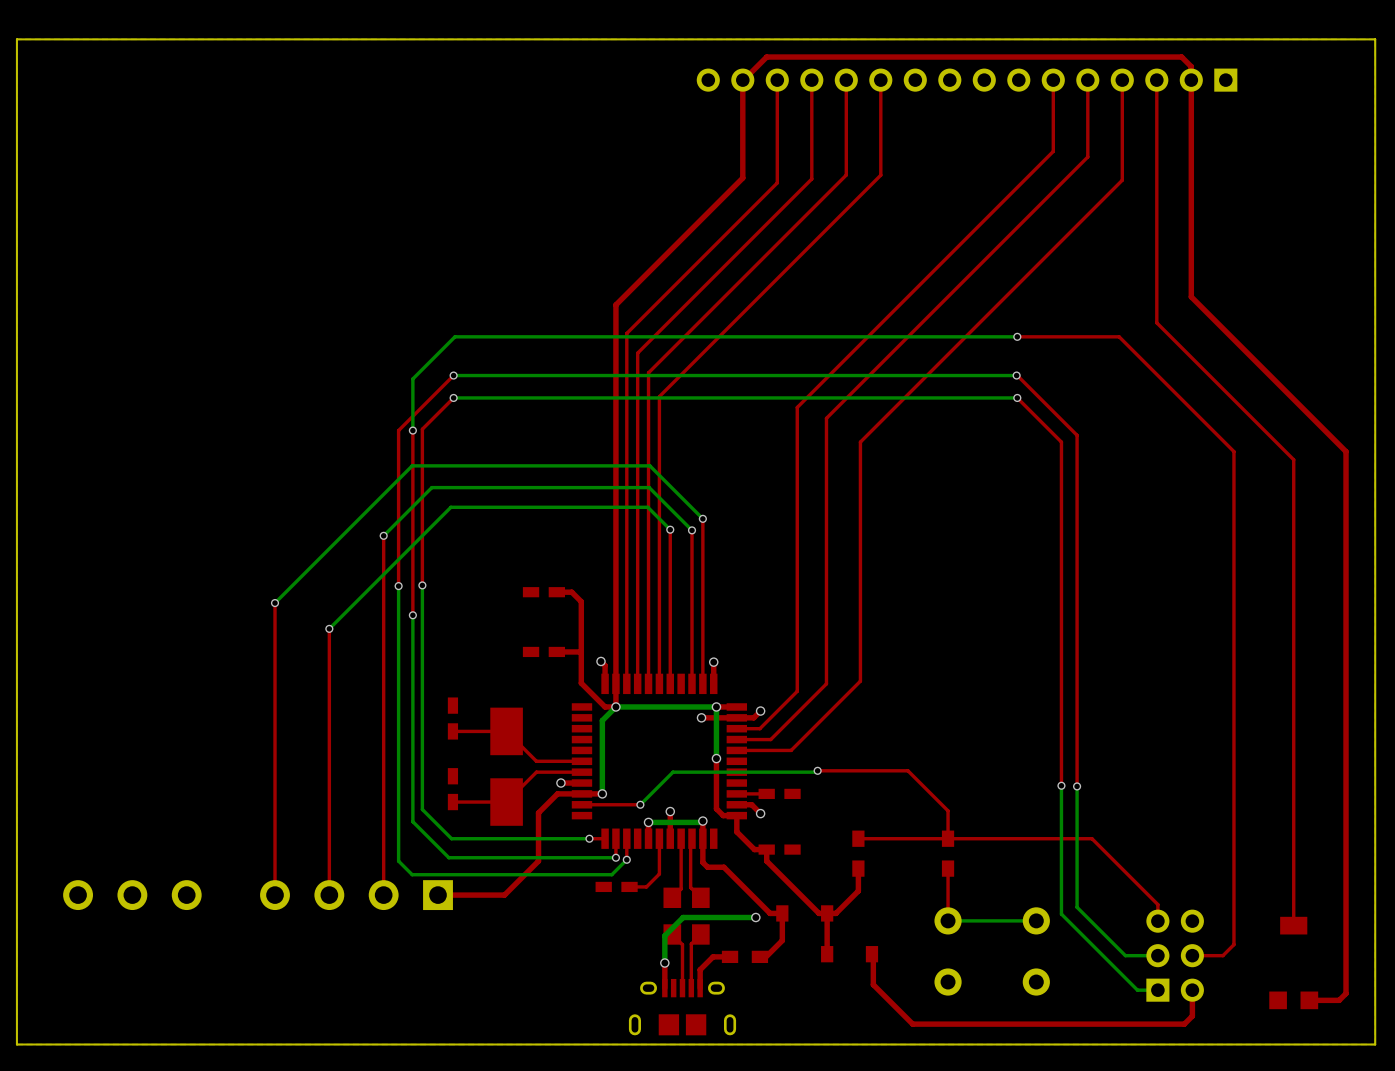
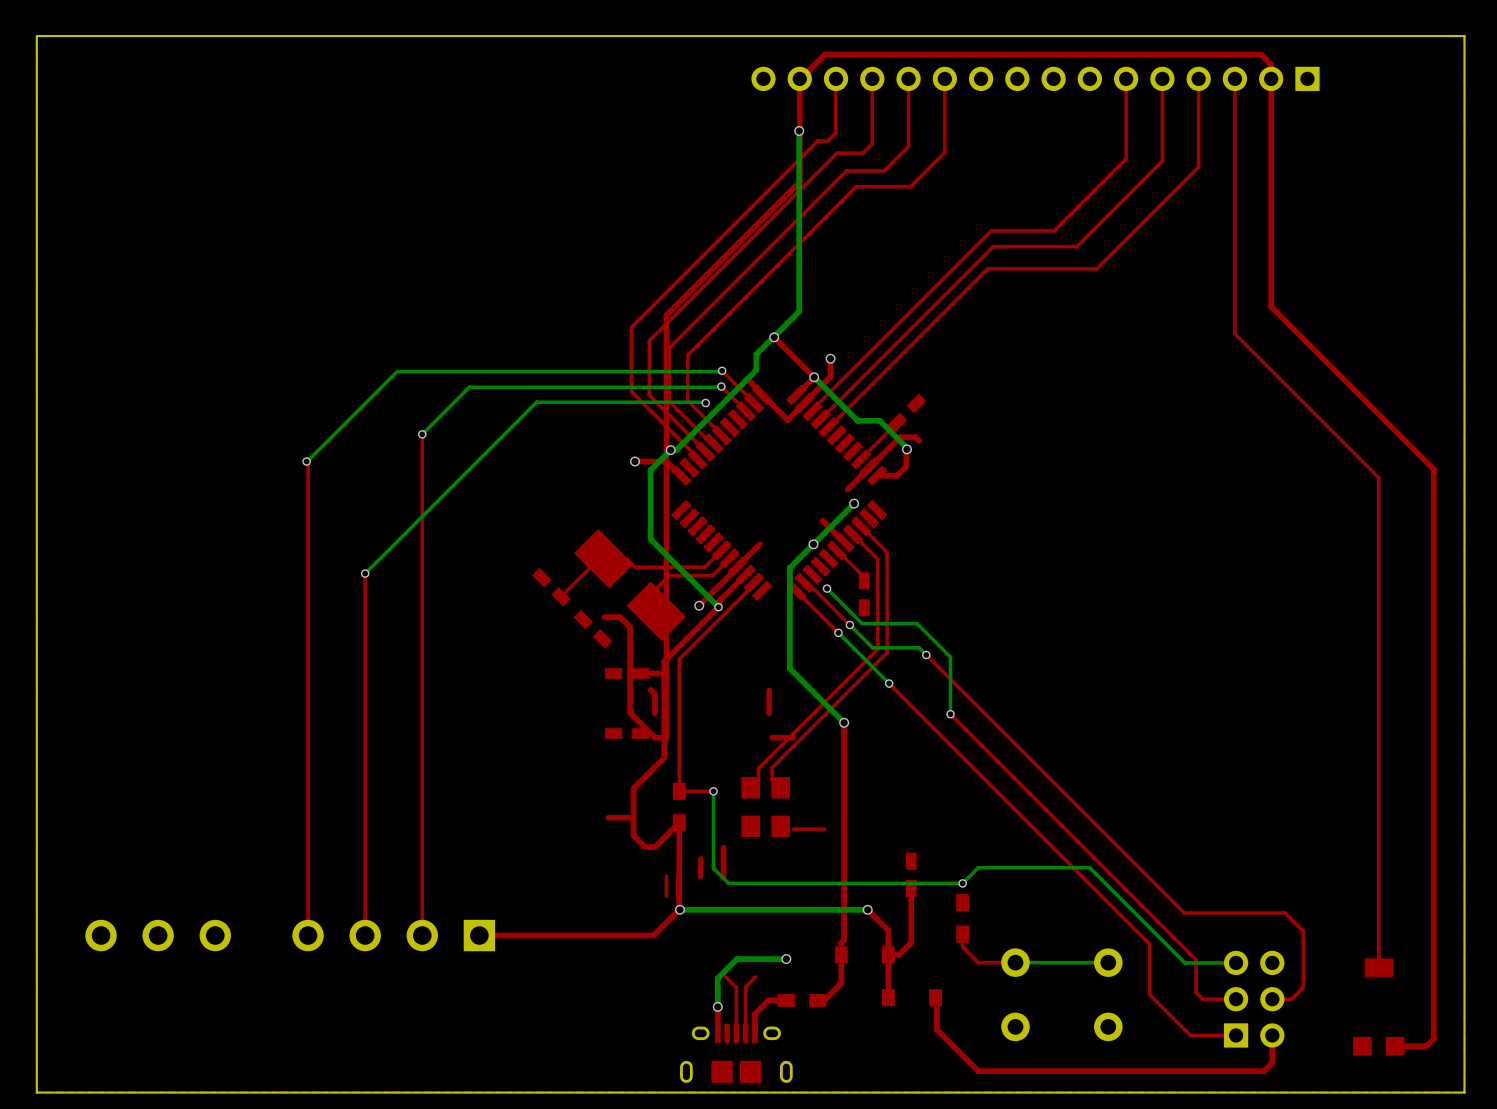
top track: none -> (835, 79) (835, 133) (827, 141) (817, 141) (631, 327) (631, 391) (697, 459)
top track: (777, 80) (777, 182) (626, 333) (626, 683) -> none
bottom track: none -> (799, 131) (799, 311) (756, 354) (756, 370) (676, 450) (670, 450) (650, 470) (650, 539) (718, 607)
via: none -> (799, 131)
top track: (811, 141) (811, 179) (637, 353) (637, 683) -> (872, 143) (862, 153) (837, 153) (649, 340) (649, 395) (705, 451)
top track: (846, 144) (846, 175) (648, 372) (648, 683) -> (908, 146) (884, 170) (846, 170) (669, 348) (669, 401) (711, 443) (713, 443)
top track: (880, 150) (880, 175) (659, 396) (659, 683) -> (944, 152) (910, 186) (856, 186) (687, 355) (687, 400) (721, 435)
top track: (1053, 151) (797, 407) (797, 691) (759, 728) (736, 728) -> (1126, 153) (1126, 158) (1054, 230) (991, 230) (812, 411)
top track: (1087, 157) (826, 418) (826, 683) (770, 739) (736, 739) -> (1162, 159) (1076, 246) (993, 246) (820, 419)
top track: (1122, 163) (1122, 180) (860, 442) (860, 681) (791, 750) (736, 750) -> (1198, 166) (1096, 268) (987, 268) (828, 427)
top track: none -> (774, 337) (814, 377) (796, 395)
via: none -> (774, 337)
top track: (1017, 336) (1119, 336) (1233, 451) (1233, 944) (1222, 955) (1210, 955) -> (926, 654) (1184, 913) (1284, 913) (1303, 931) (1303, 987) (1291, 999)
bottom track: (1017, 336) (454, 336) (412, 378) (412, 430) -> none
via: (1017, 336) -> none
top track: none -> (830, 358) (830, 376) (804, 403)
via: none -> (830, 358)
top track: none -> (722, 370) (753, 403)
bottom track: none -> (722, 370) (397, 371) (306, 461)
via: none -> (722, 370)
bottom track: none -> (814, 377) (857, 420) (879, 420) (906, 449)
via: none -> (814, 377)
top track: none -> (747, 379) (787, 420) (804, 403)
top track: none -> (721, 386) (745, 411)
bottom track: none -> (721, 386) (469, 387) (422, 434)
via: none -> (721, 386)
top track: (453, 375) (398, 430) (398, 586) -> none
via: (453, 375) -> none
top track: (1016, 375) (1077, 435) (1077, 786) -> none
bottom track: (1016, 375) (453, 375) -> none
via: (1016, 375) -> none
bottom track: none -> (705, 402) (536, 402) (365, 573)
via: none -> (705, 402)
top track: (453, 397) (422, 429) (422, 585) -> none
via: (453, 397) -> none
part: none -> (906, 412)
top track: (1017, 397) (1061, 442) (1061, 785) -> none
bottom track: (1017, 397) (453, 397) -> none
via: (1017, 397) -> none
top track: none -> (897, 422) (860, 458) (862, 459)
top track: none -> (422, 434) (422, 557)
top track: none -> (919, 440) (915, 437) (899, 437) (869, 467)
top track: (412, 430) (412, 615) -> none
via position: (412, 430) -> (422, 434)
top track: none -> (906, 449) (906, 466) (897, 475) (877, 475) (884, 468)
via: none -> (906, 449)
via: none -> (670, 450)
top track: none -> (306, 461) (308, 628)
via: none -> (306, 461)
top track: none -> (635, 461) (666, 461) (681, 475)
via: none -> (635, 461)
top track: none -> (869, 467) (847, 489)
part: none -> (779, 492)
bottom track: none -> (854, 503) (789, 567) (789, 668) (844, 722)
via: none -> (854, 503)
top track: none -> (822, 520) (844, 542)
top track: none -> (861, 526) (887, 552) (887, 652) (772, 767) (772, 779) (780, 787)
top track: none -> (852, 535) (877, 559) (877, 649) (758, 768) (758, 779) (750, 787)
top track: (702, 518) (702, 683) -> none
bottom track: (702, 518) (649, 465) (412, 465) (275, 603) -> none
via: (702, 518) -> none
top track: none -> (759, 544) (699, 605)
via: none -> (813, 544)
top track: none -> (720, 550) (704, 567) (635, 567) (626, 558) (599, 558) (561, 596)
top track: none -> (837, 550) (864, 577) (864, 580)
top track: (670, 529) (670, 683) -> none
bottom track: (670, 529) (647, 507) (450, 507) (329, 628) -> none
via: (670, 529) -> none
top track: (692, 530) (692, 683) -> none
bottom track: (692, 530) (649, 487) (431, 487) (383, 535) -> none
via: (692, 530) -> none
via: (383, 535) -> none
top track: none -> (728, 558) (712, 575) (669, 575) (656, 588) (656, 611)
top track: none -> (365, 573) (365, 655)
via: none -> (365, 573)
top track: none -> (745, 574) (719, 601) (719, 606) (664, 661) (664, 757) (633, 788) (633, 835) (645, 847) (654, 847) (679, 822)
top track: none -> (753, 582) (679, 659) (679, 791) (713, 791)
top track: none -> (804, 582) (807, 582) (849, 624)
part: none -> (630, 585)
part: none -> (551, 587)
bottom track: none -> (827, 588) (862, 623) (916, 623) (950, 657) (950, 714)
via: none -> (827, 588)
top track: none -> (796, 590) (838, 632)
part: none -> (864, 594)
via: none -> (699, 605)
via: none -> (718, 607)
bottom track: (422, 585) (422, 809) (451, 838) (589, 838) -> none
via: (422, 585) -> none
bottom track: (398, 586) (398, 861) (412, 874) (611, 874) (626, 859) -> none
via: (398, 586) -> none
part rotation: 0° (543, 592) -> 45° clockwise (592, 629)
bottom track: none -> (849, 624) (872, 647) (919, 647) (926, 654)
via: none -> (849, 624)
via: (275, 603) -> none
bottom track: none -> (838, 632) (889, 683)
via: none -> (838, 632)
bottom track: (412, 615) (412, 821) (448, 857) (615, 857) -> none
via: (412, 615) -> none
via: (329, 628) -> none
via: none -> (926, 654)
part: none -> (627, 673)
top track: none -> (664, 673) (640, 673)
part: (543, 651) -> none
top track: (581, 651) (556, 651) -> none
top track: none -> (889, 683) (1149, 944) (1149, 994) (1190, 1035) (1236, 1035)
via: none -> (889, 683)
via: (601, 661) -> none
via: (713, 662) -> none
top track: none -> (950, 714) (1196, 959) (1196, 992) (1202, 999) (1236, 999)
via: none -> (950, 714)
part: none -> (627, 733)
via: (615, 706) -> none
via: (716, 706) -> none
top track: (760, 711) (753, 717) (701, 717) -> none
via position: (760, 711) -> (844, 722)
via: (701, 717) -> none
part: (452, 718) -> none
top track: (452, 731) (506, 731) (536, 761) (581, 761) -> none
bottom track: none -> (713, 791) (713, 868) (728, 883) (962, 883) (978, 867) (1089, 867) (1184, 962) (1236, 962)
top track: (716, 758) (716, 808) (723, 815) (736, 815) (736, 831) (754, 849) (766, 849) (766, 861) (819, 913) (827, 913) -> (867, 909) (888, 930) (888, 954)
bottom track: (716, 758) (716, 706) (615, 706) (602, 720) (602, 793) -> none
via: (716, 758) -> none
part: (659, 761) -> none
part: (506, 766) -> none
top track: (817, 770) (907, 770) (948, 810) (948, 838) -> none
bottom track: (817, 770) (672, 772) (640, 804) -> none
via: (817, 770) -> none
top track: (581, 772) (536, 772) (506, 802) (452, 802) -> none
part: none -> (679, 807)
part: none -> (750, 807)
part: none -> (780, 807)
via: (560, 783) -> none
bottom track: (1061, 785) (1061, 914) (1137, 990) (1157, 990) -> none
via: (1061, 785) -> none
bottom track: (1077, 786) (1077, 907) (1125, 955) (1157, 955) -> none
via: (1077, 786) -> none
top track: none -> (679, 822) (679, 909)
part: (452, 789) -> none
top track: (602, 793) (557, 793) (538, 812) (538, 861) (504, 895) -> (679, 909) (653, 935) (549, 935)
via: (602, 793) -> none
part: (779, 793) -> none
top track: (640, 804) (581, 804) -> none
via position: (640, 804) -> (713, 791)
top track: (736, 804) (751, 804) (760, 813) -> none
via: (670, 811) -> none
via: (760, 813) -> none
top track: (702, 821) (702, 862) (707, 867) (723, 867) (770, 913) (782, 913) -> (844, 722) (844, 939) (841, 942) (841, 954)
bottom track: (702, 821) (648, 822) -> none
via: (702, 821) -> none
via: (648, 822) -> none
part: none -> (911, 874)
via: (589, 838) -> none
top track: (605, 838) (589, 838) -> none
top track: (659, 838) (659, 874) (646, 886) (629, 886) -> none
top track: (681, 838) (681, 888) (672, 897) -> none
top track: (692, 838) (690, 887) (700, 897) -> none
top track: (858, 838) (1092, 838) (1157, 904) (1157, 921) -> none
via: none -> (962, 883)
part: (779, 849) -> none
part: (858, 853) -> none
part: (948, 853) -> none
via: (615, 857) -> none
via: (626, 859) -> none
top track: (858, 868) (858, 891) (835, 913) -> (911, 888) (911, 942) (897, 954)
top track: (948, 868) (948, 920) -> (962, 934) (962, 946) (978, 962) (1015, 962)
via: none -> (679, 909)
bottom track: none -> (867, 909) (679, 909)
via: none -> (867, 909)
part: none -> (962, 918)
part: (616, 886) -> none
part: (672, 916) -> none
part: (700, 916) -> none
bottom track: (755, 917) (730, 917) -> none
via position: (755, 917) -> (786, 959)

